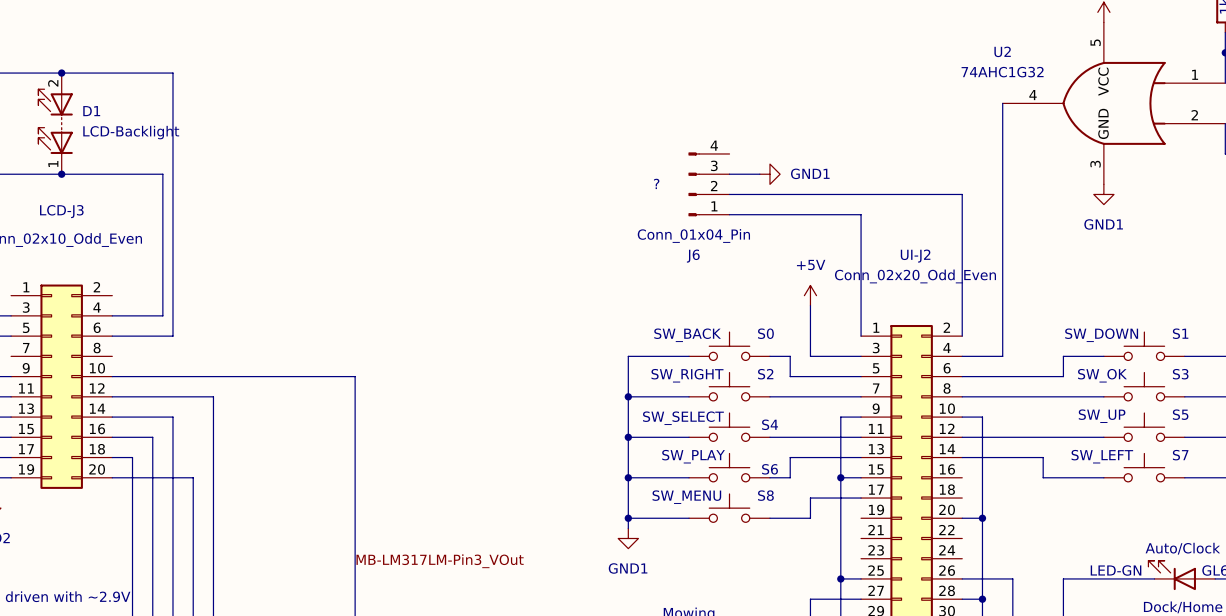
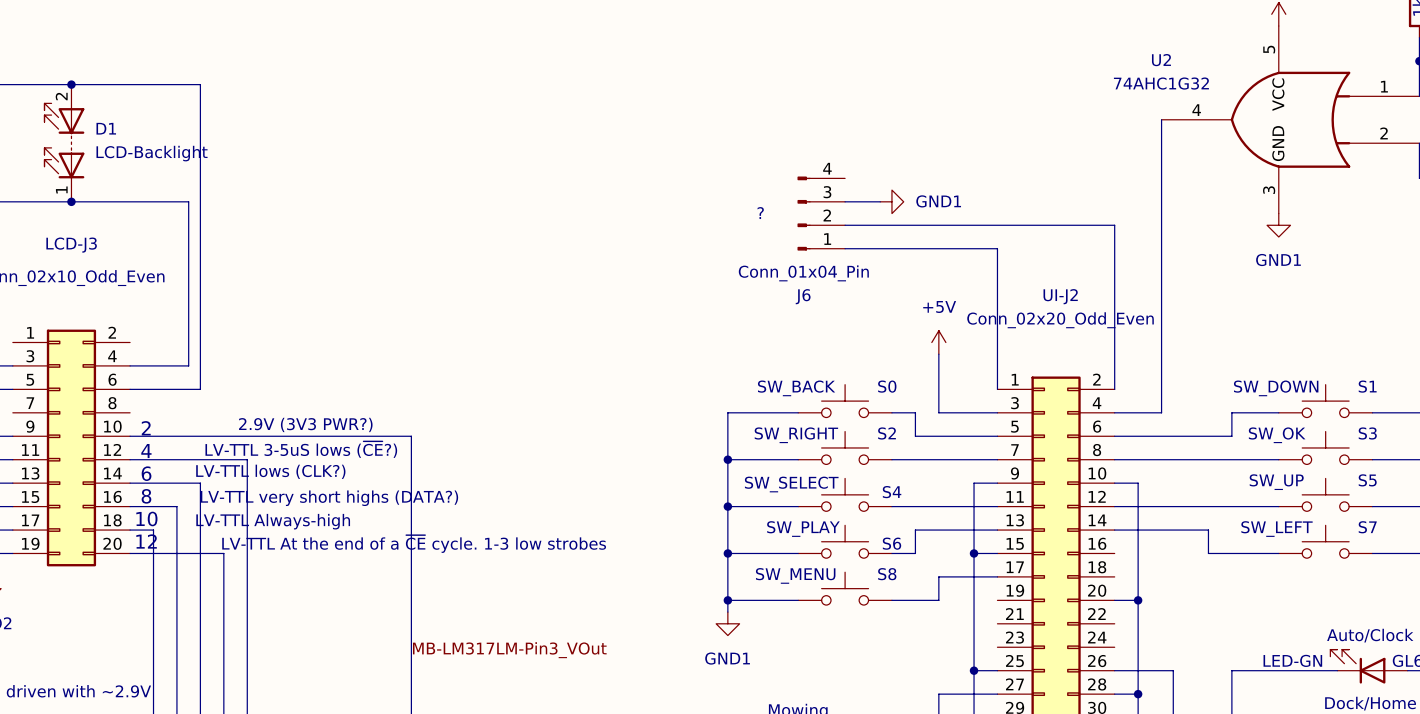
text: none -> 2.9V (3V3 PWR?) (305, 424)
text: none -> 2 (146, 428)
text: none -> LV-TTL 3-5uS lows (~{CE}?) (301, 449)
text: none -> 4 (146, 451)
text: none -> LV-TTL lows (CLK?) (270, 471)
text: none -> 6 (146, 473)
text: none -> 8 (146, 496)
text: none -> LV-TTL very short highs (DATA?) (329, 498)
text: none -> 10 (146, 518)
text: none -> LV-TTL Always-high (273, 521)
text: none -> 12 (146, 541)
text: none -> LV-TTL At the end of a ~{CE} cycle. 1-3 low strobes (414, 544)

